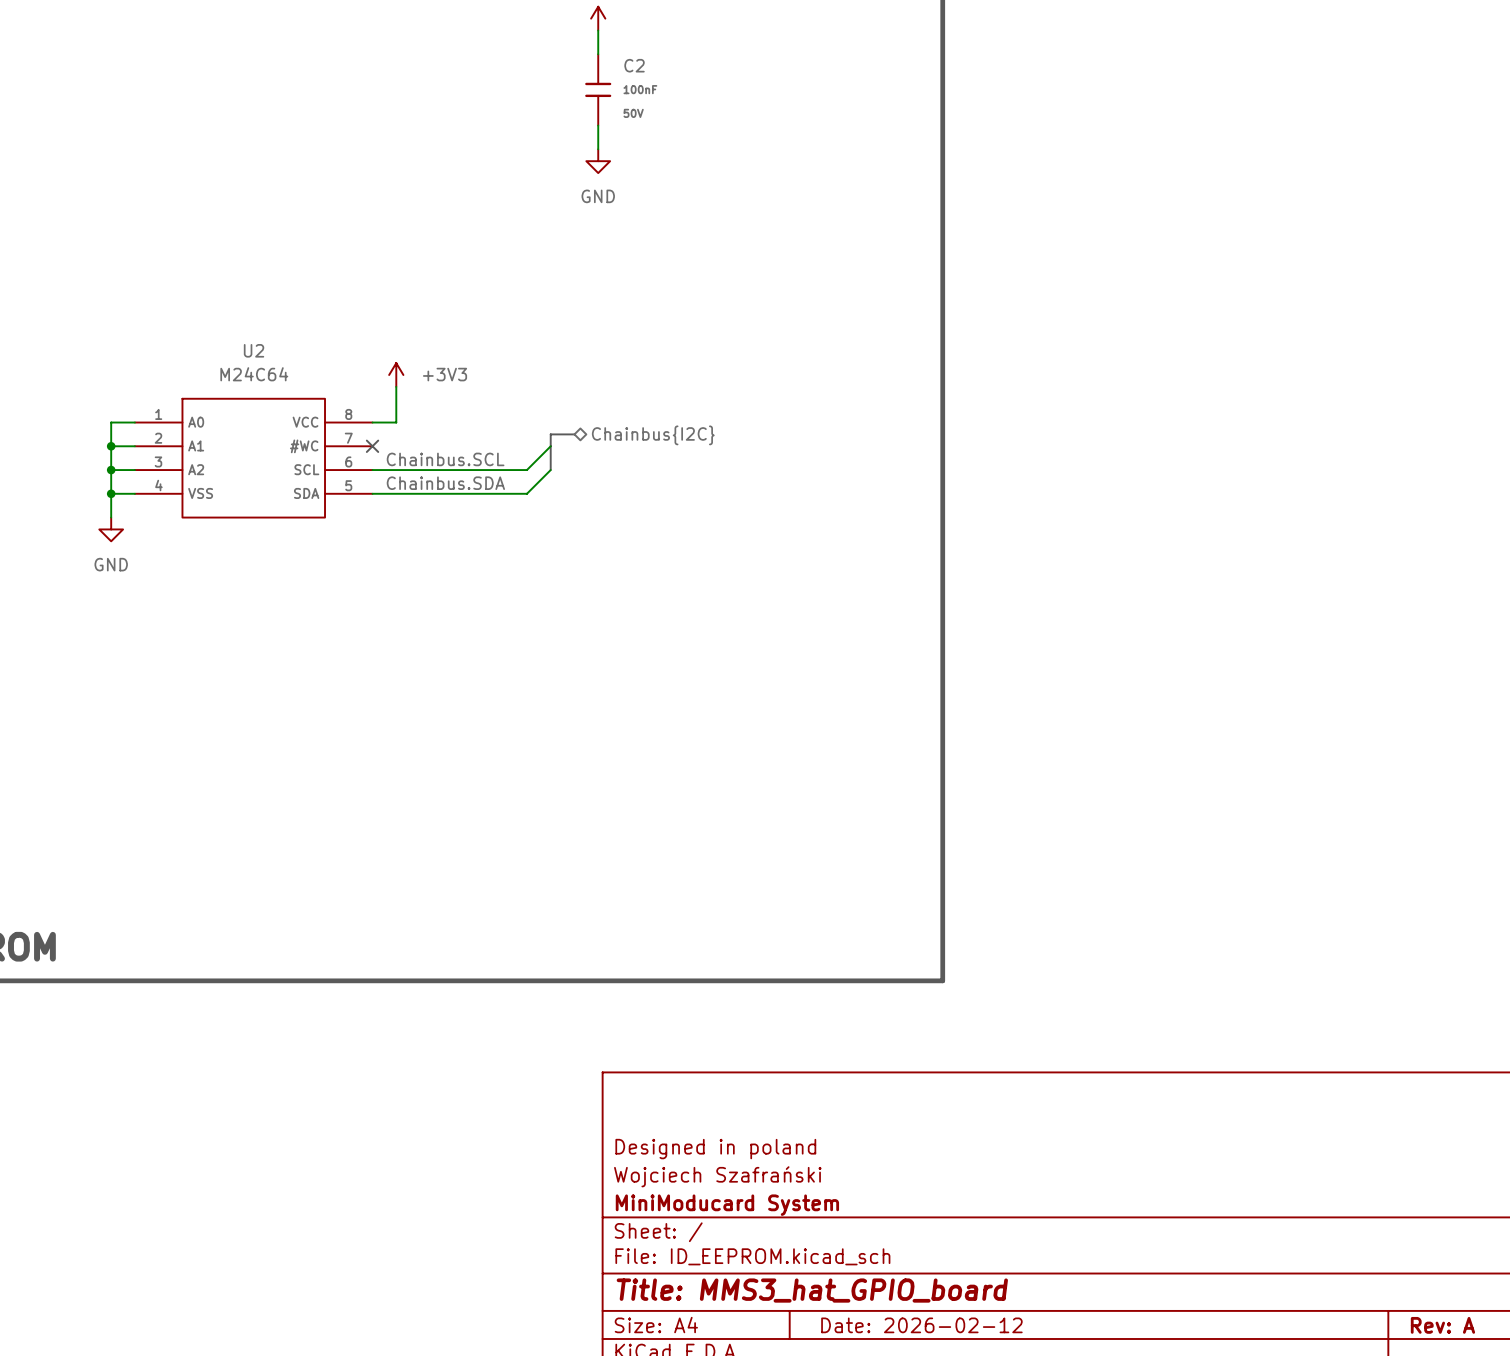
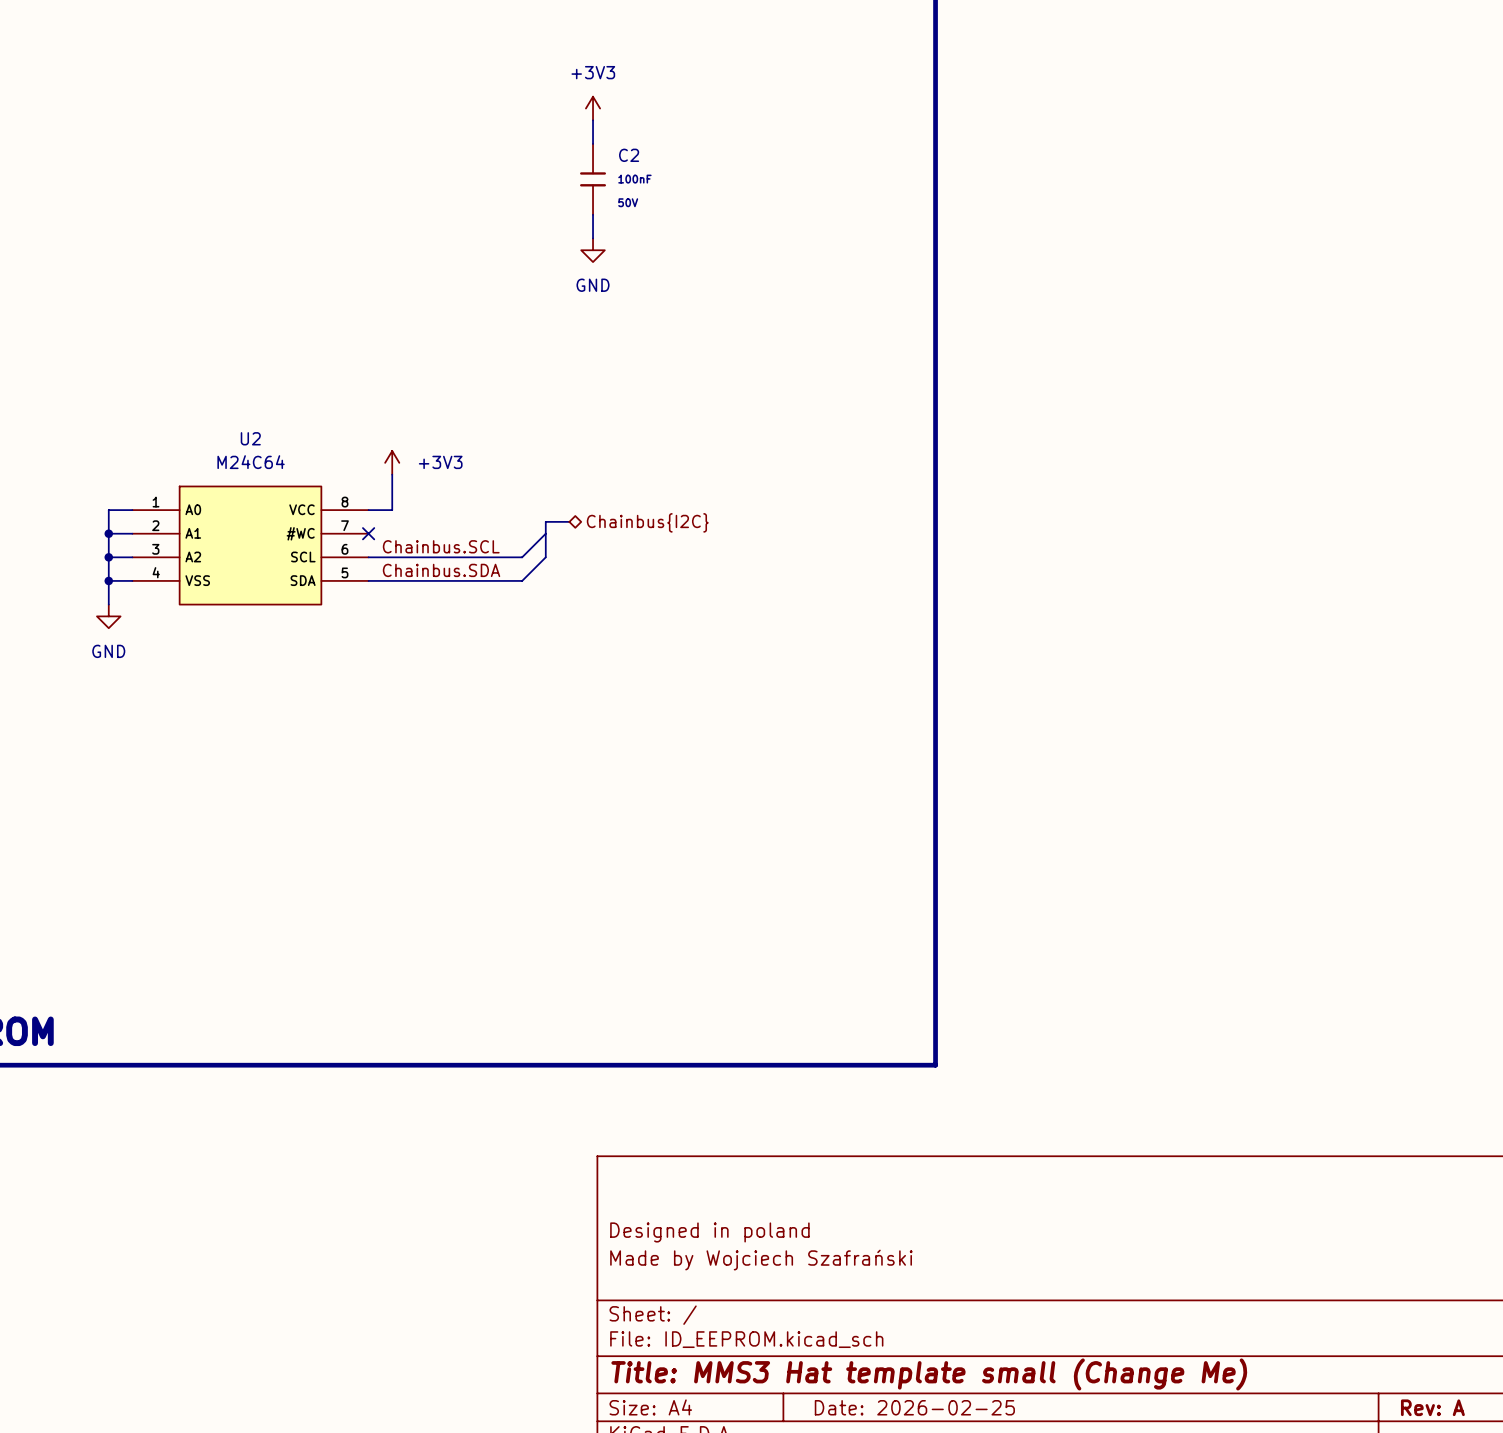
title block: Wojciech Szafrański (717, 1176) -> Made by Wojciech Szafrański (761, 1260)
title block: MiniModucard System (727, 1205) -> none
title block: Title: MMS3_hat_GPIO_board (812, 1290) -> Title: MMS3 Hat template small (Change Me) (929, 1374)
title block: Date: 2026-02-12 (921, 1325) -> Date: 2026-02-25 (914, 1407)

